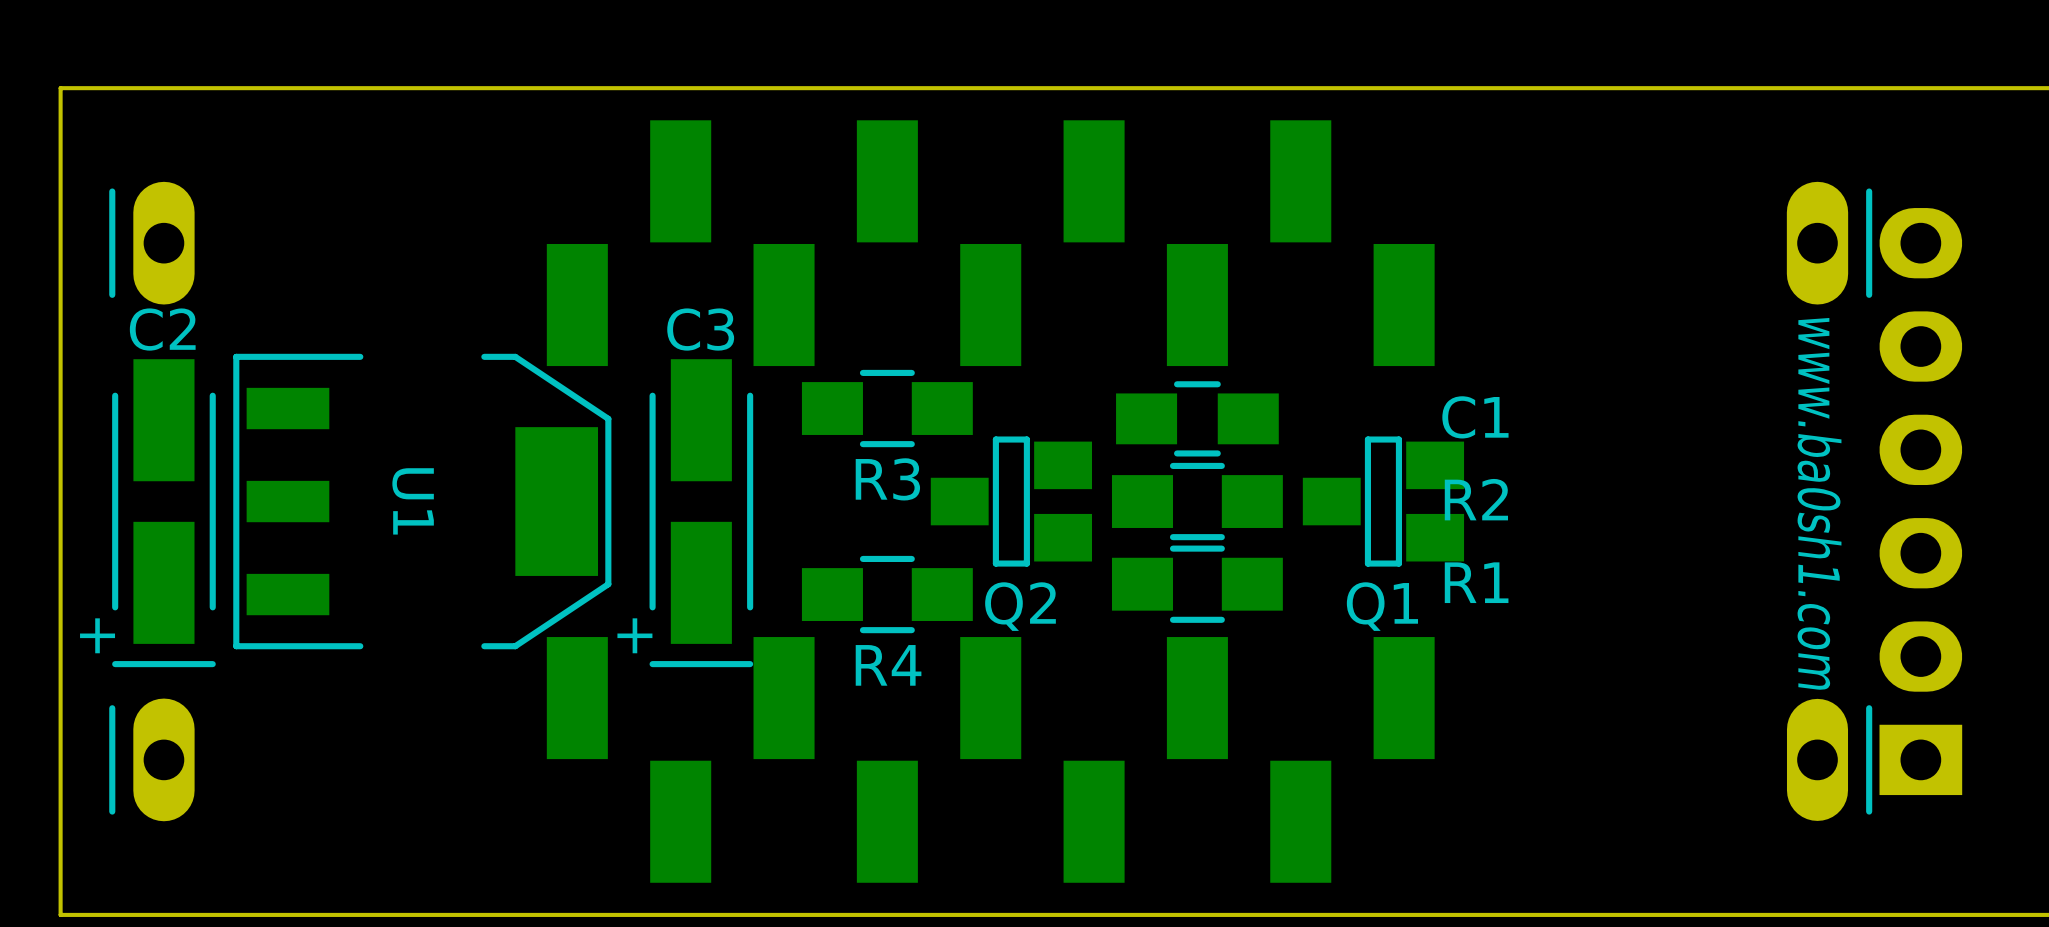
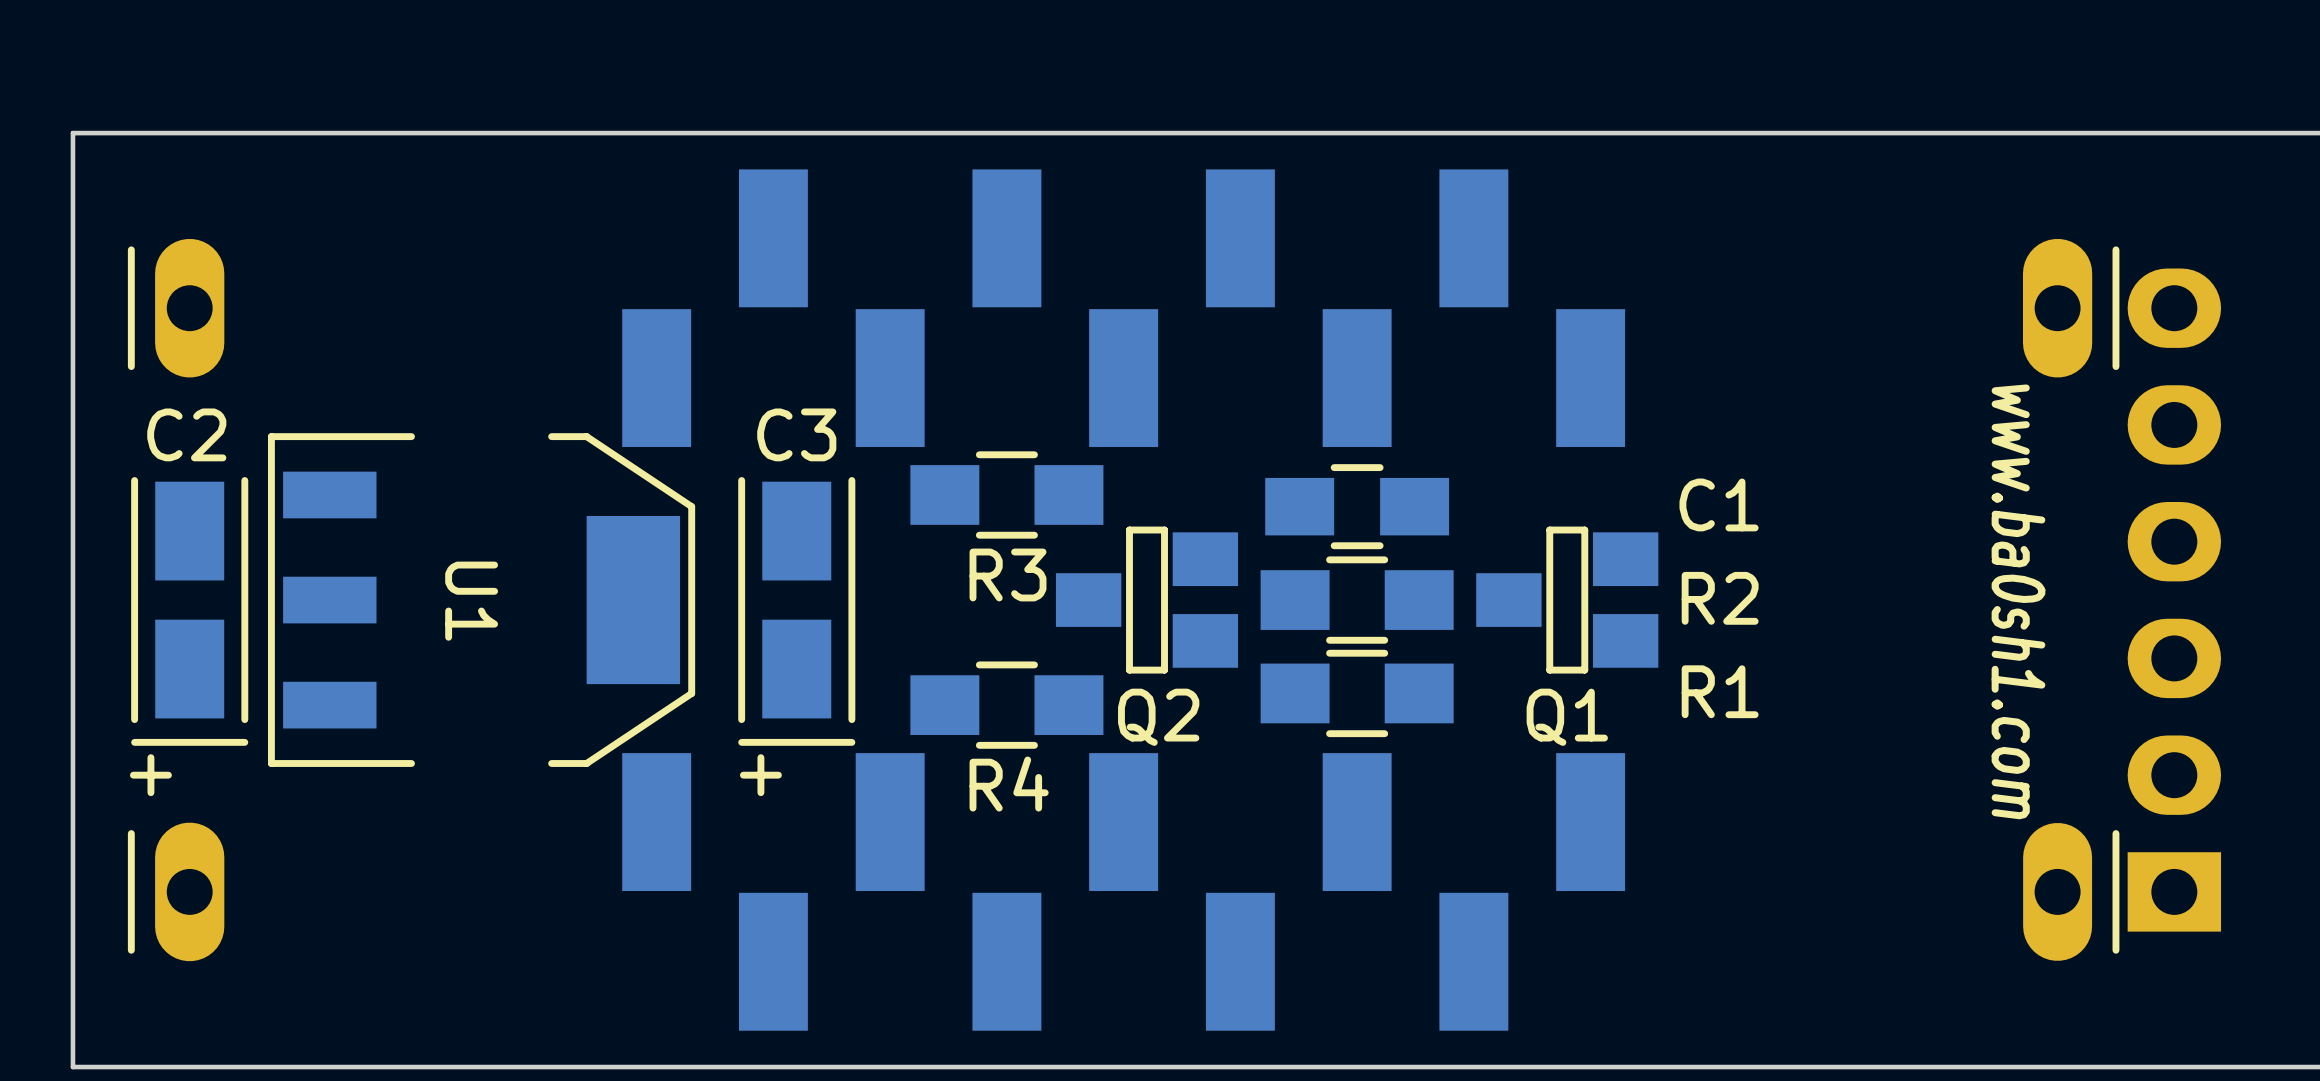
C2 footprint: [112, 359, 216, 668] -> [131, 477, 249, 746]
C3 footprint: [649, 359, 754, 668] -> [738, 477, 856, 746]
C1 name position: C1 (1475, 417) -> C1 (1719, 504)
R2 name position: R2 (1476, 499) -> R2 (1720, 598)
text position: www.ba0sh1.com (1819, 504) -> www.ba0sh1.com (2018, 601)
R1 name position: R1 (1476, 582) -> R1 (1720, 691)

